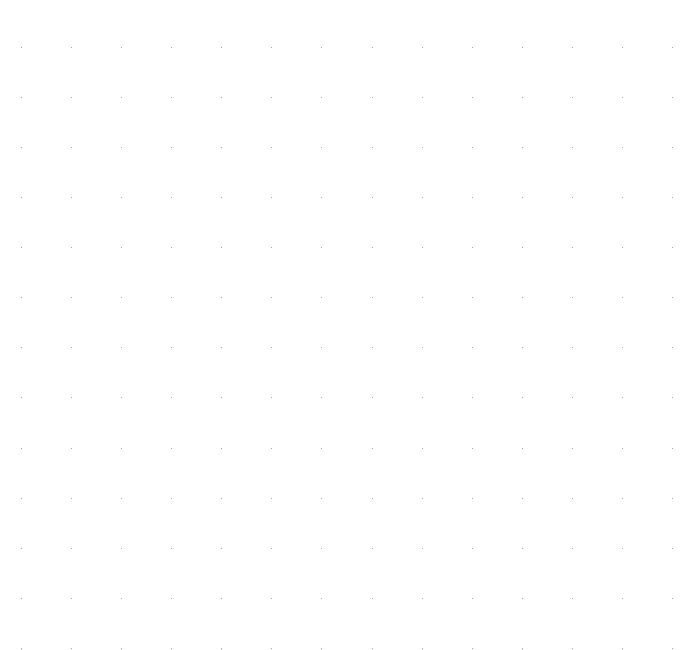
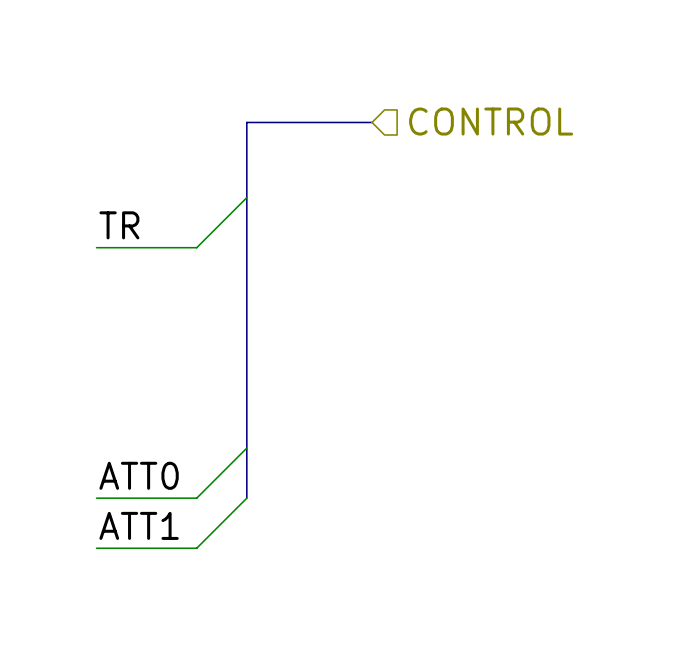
hierarchical label: none -> CONTROL (491, 121)
bus: none -> (372, 122) (246, 122) (246, 498)
wire: none -> (246, 197) (196, 247) (96, 247)
label: none -> TR (119, 225)
wire: none -> (246, 448) (196, 498) (96, 498)
label: none -> ATT0 (139, 475)
wire: none -> (246, 498) (196, 548) (96, 548)
label: none -> ATT1 (139, 525)

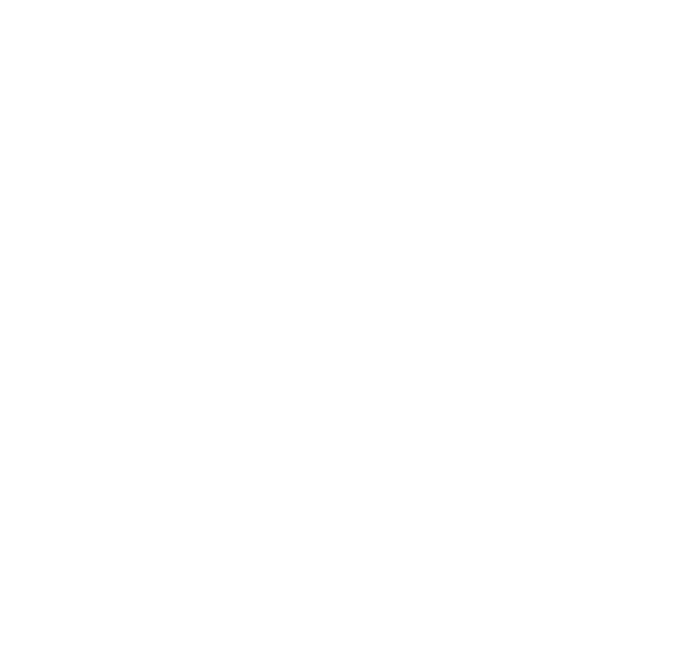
hierarchical label: CONTROL (491, 121) -> none
bus: (372, 122) (246, 122) (246, 498) -> none
wire: (246, 197) (196, 247) (96, 247) -> none
label: TR (119, 225) -> none
wire: (246, 448) (196, 498) (96, 498) -> none
label: ATT0 (139, 475) -> none
wire: (246, 498) (196, 548) (96, 548) -> none
label: ATT1 (139, 525) -> none

